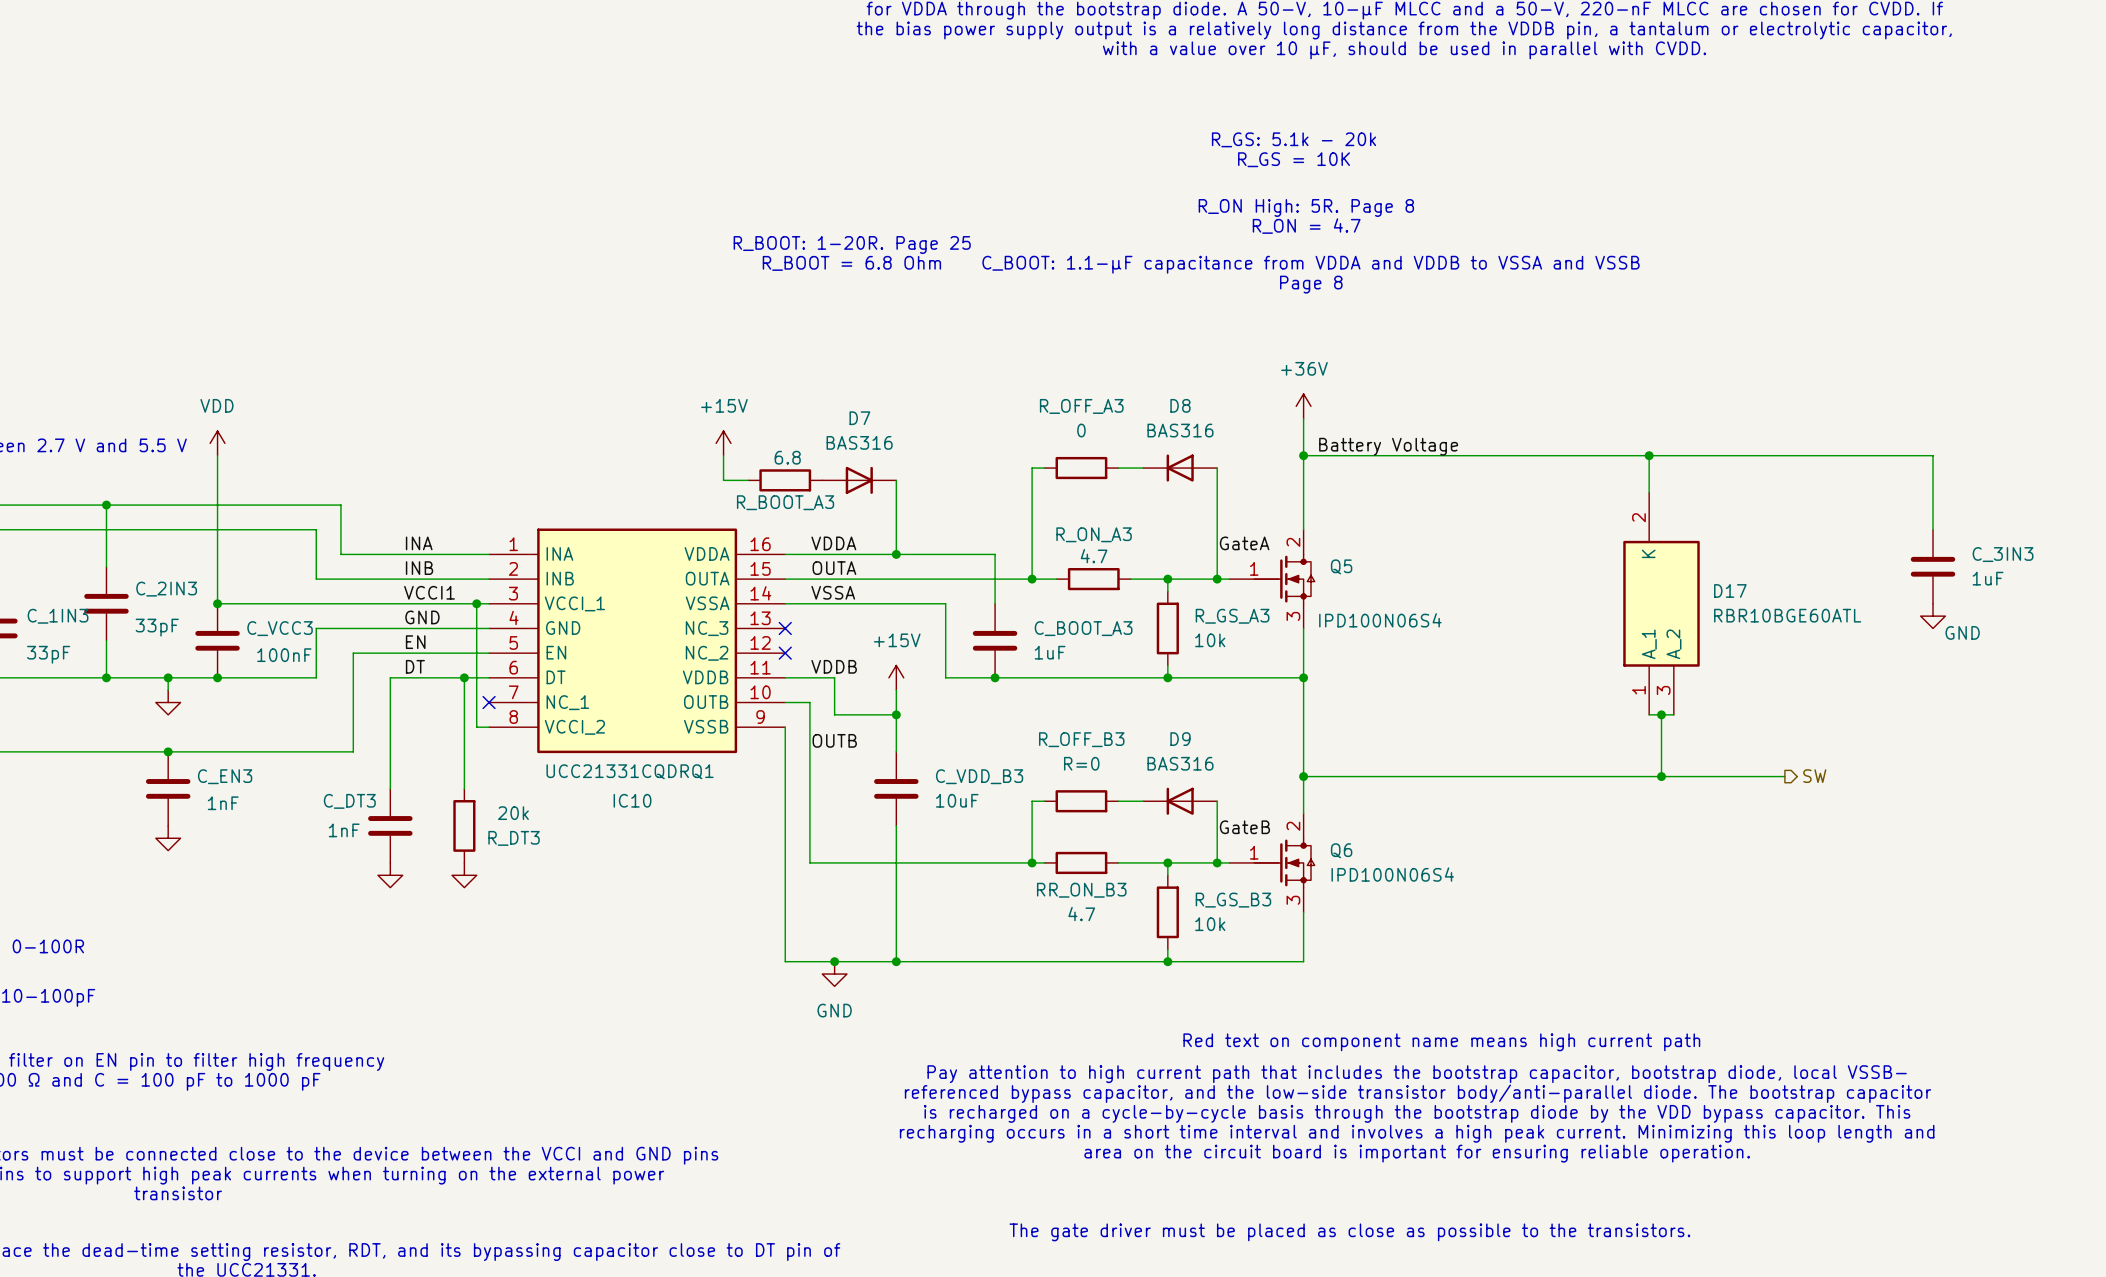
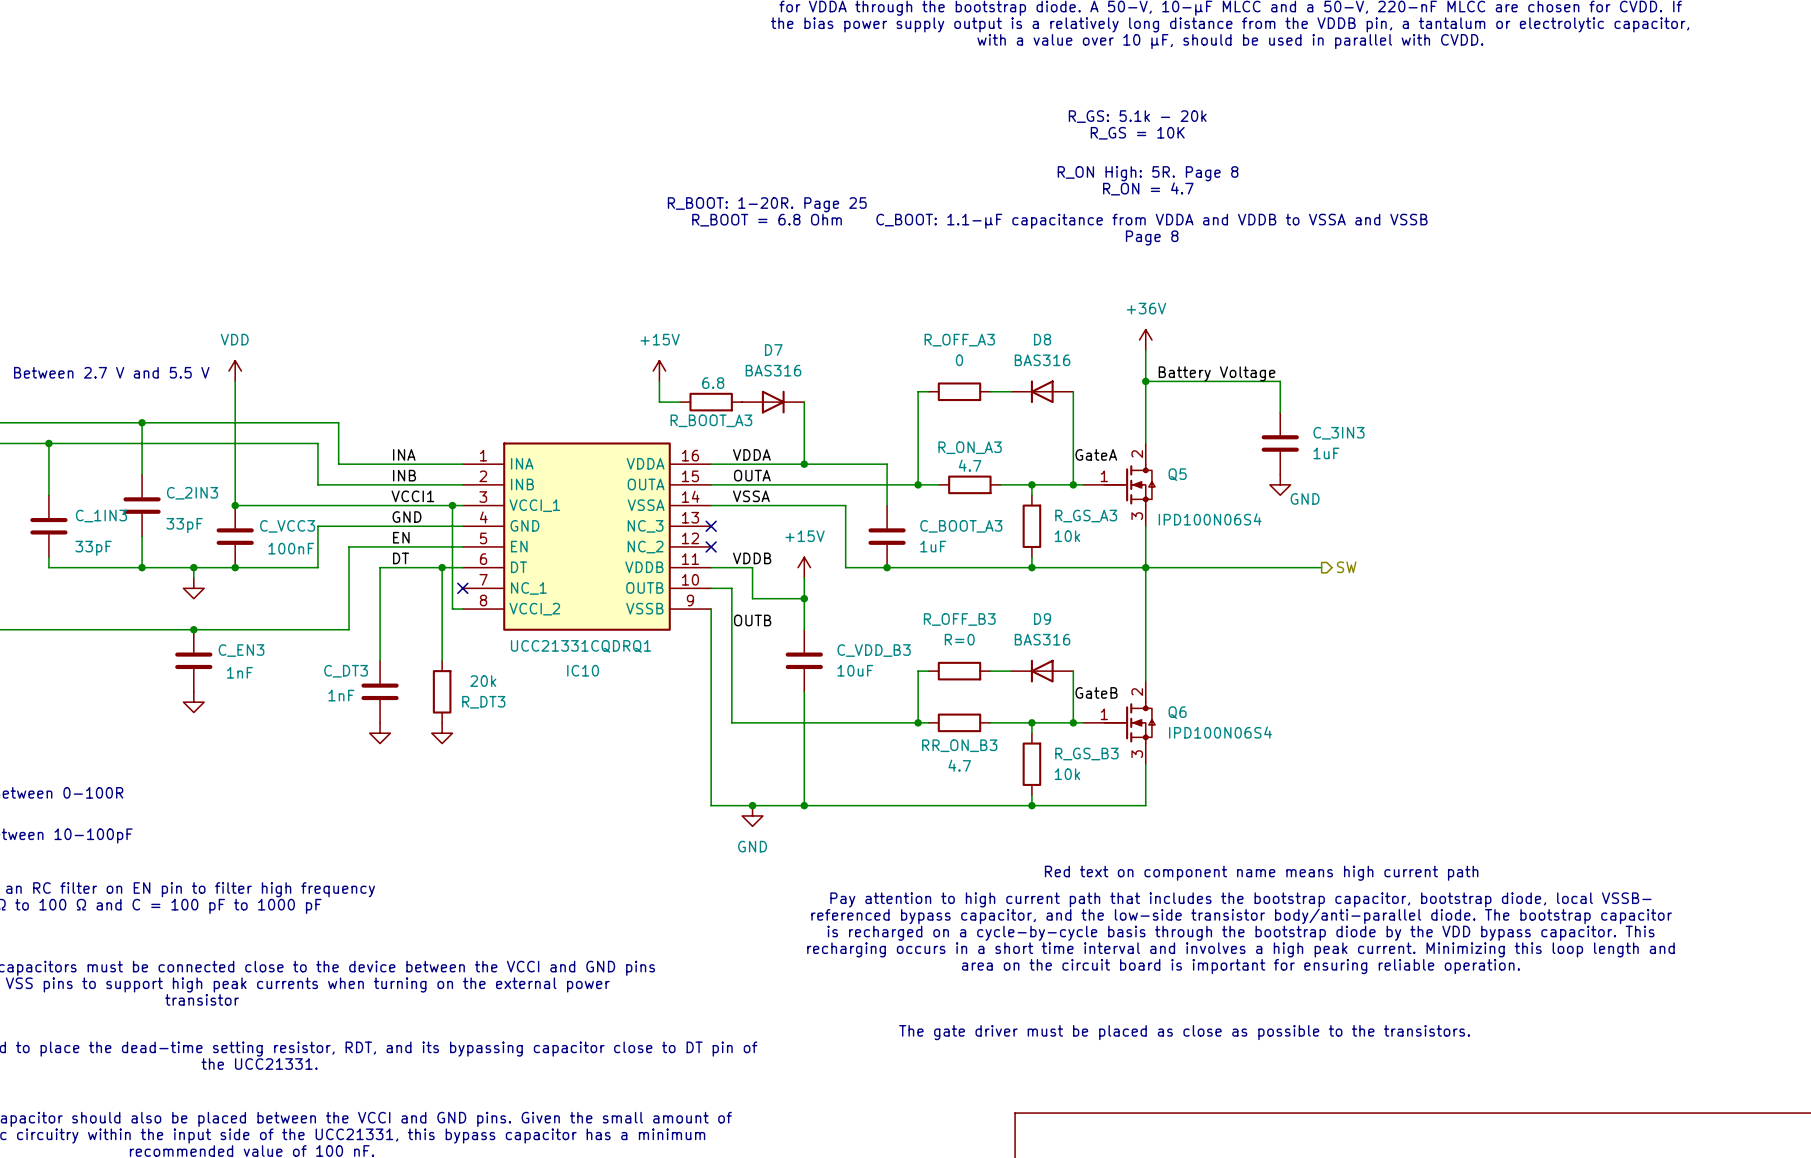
wire: (1464, 455) (1933, 455) (1933, 529) -> (1280, 381) (1280, 412)
wire: (1649, 455) (1649, 492) -> none
junction: (1649, 455) -> none
C_3IN3 position: (1933, 566) -> (1280, 443)
power symbol: none -> GND (1280, 484)
D17: RBR10BGE60ATL (1661, 603) -> none
power symbol: GND (1933, 616) -> none
wire: none -> (1145, 567) (1321, 567)
hierarchical label: none -> SW (1346, 567)
wire: (1649, 714) (1673, 714) -> none
wire: (1661, 714) (1661, 776) -> none
junction: (1661, 714) -> none
wire: (1303, 776) (1784, 776) -> none
junction: (1303, 776) -> none
junction: (1661, 776) -> none
hierarchical label: SW (1814, 776) -> none

